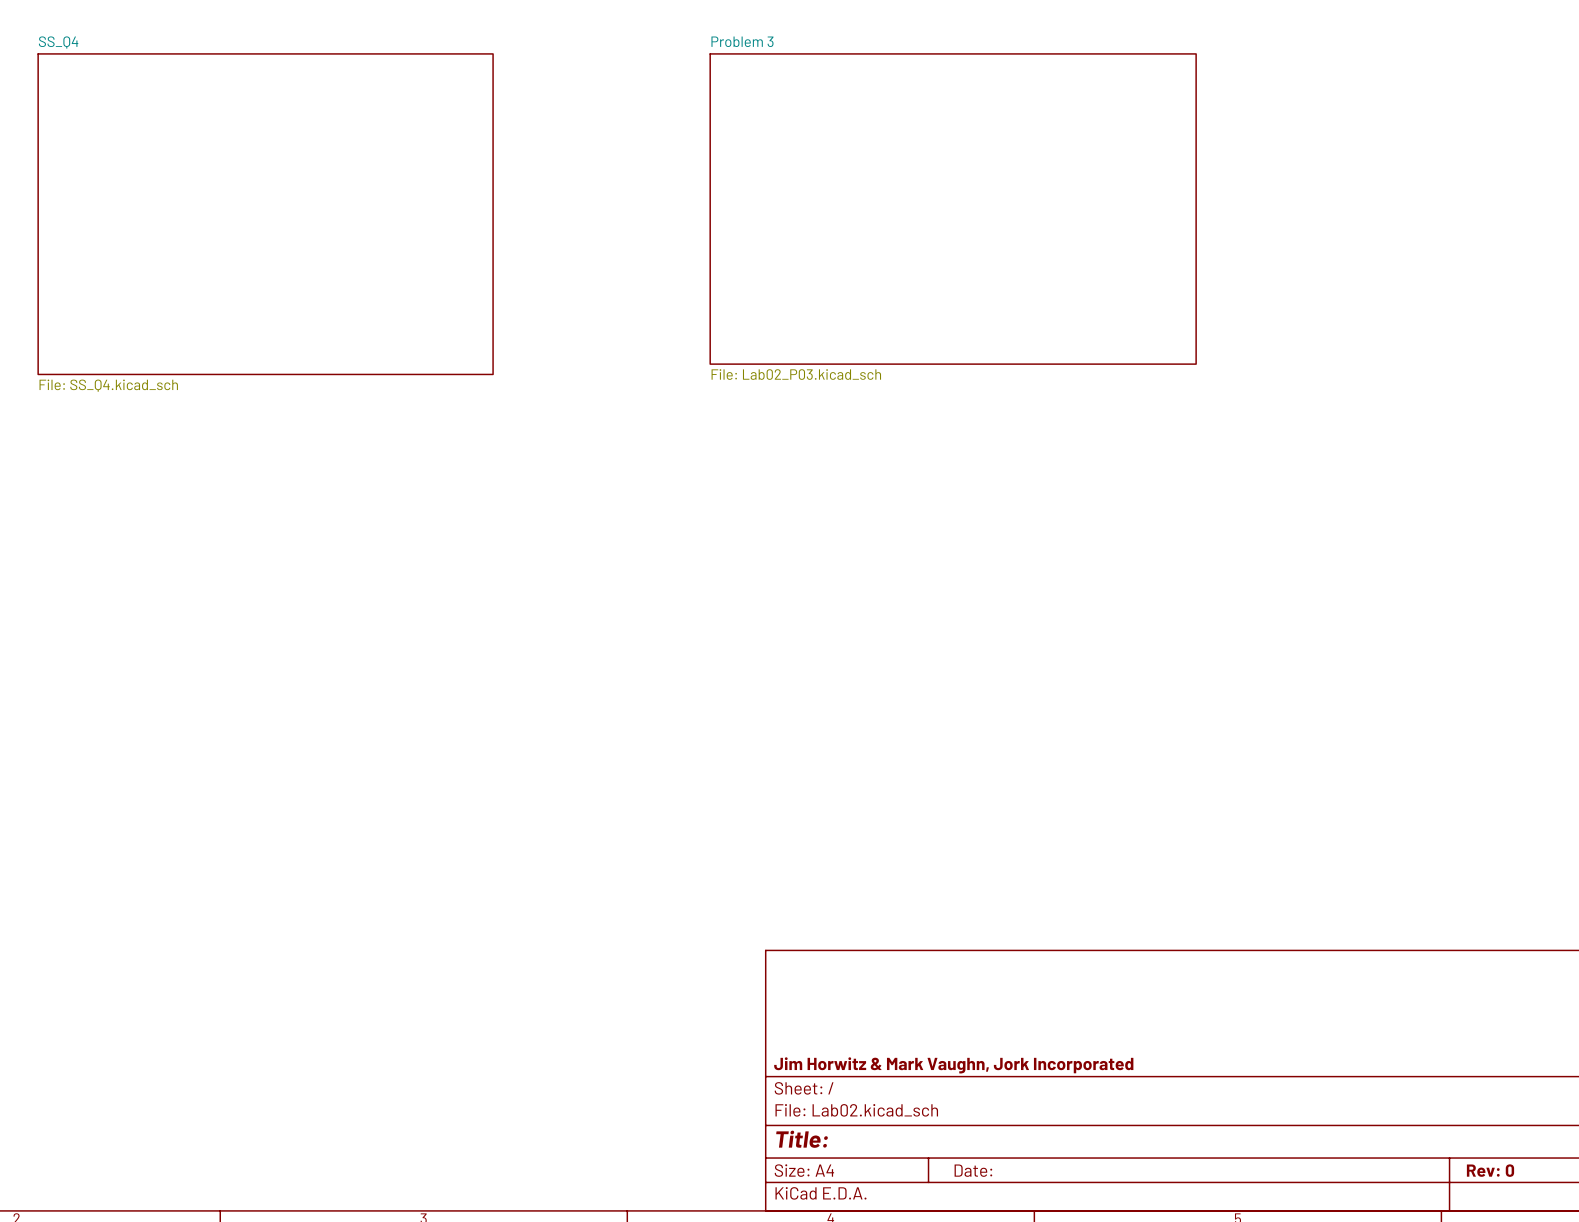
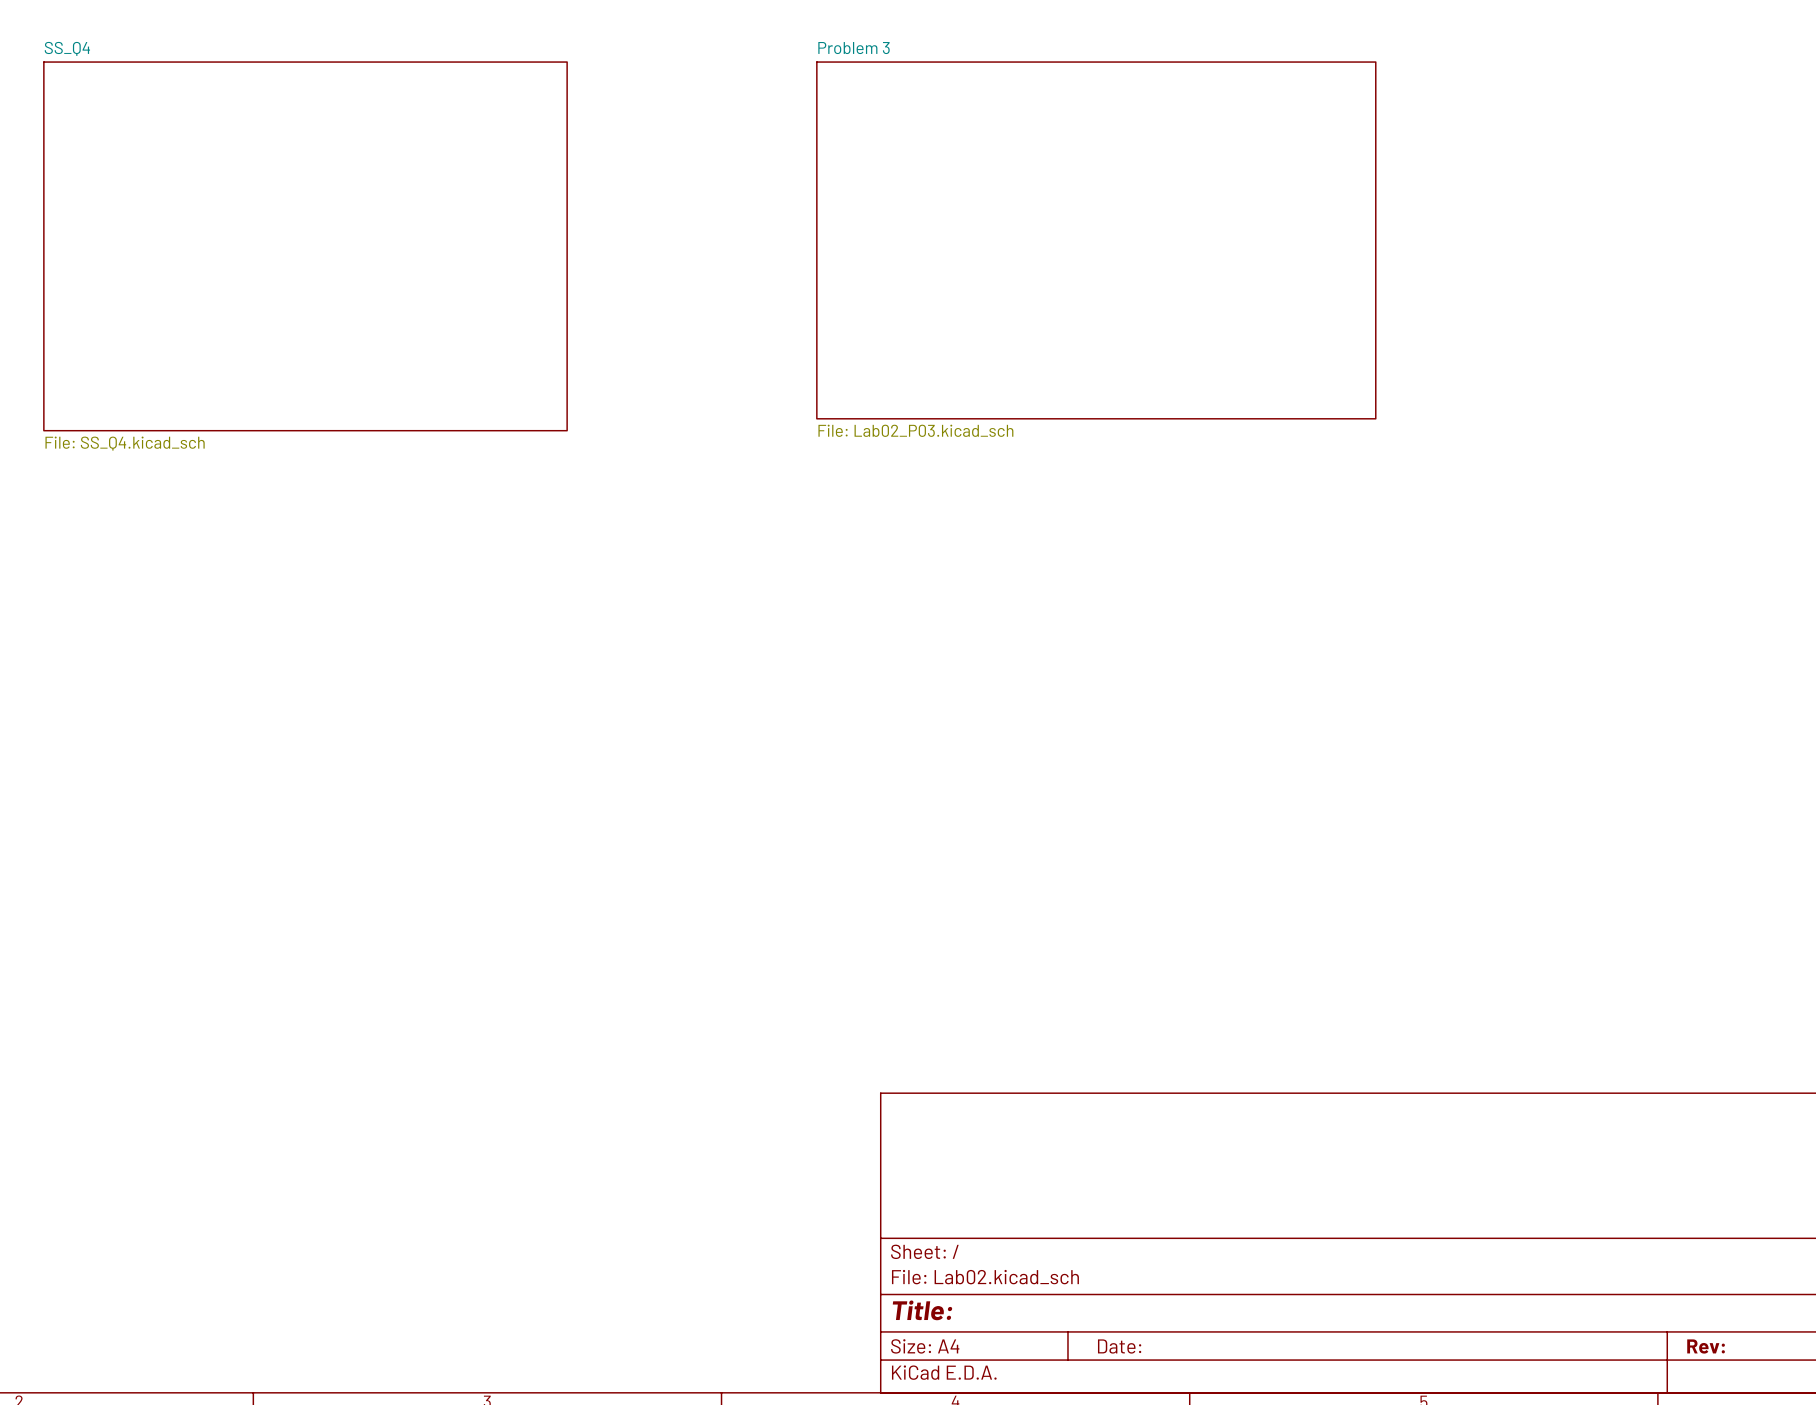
title block: Jim Horwitz & Mark Vaughn, Jork Incorporated (953, 1065) -> none
title block: Rev: 0 (1490, 1170) -> Rev: (1706, 1346)

